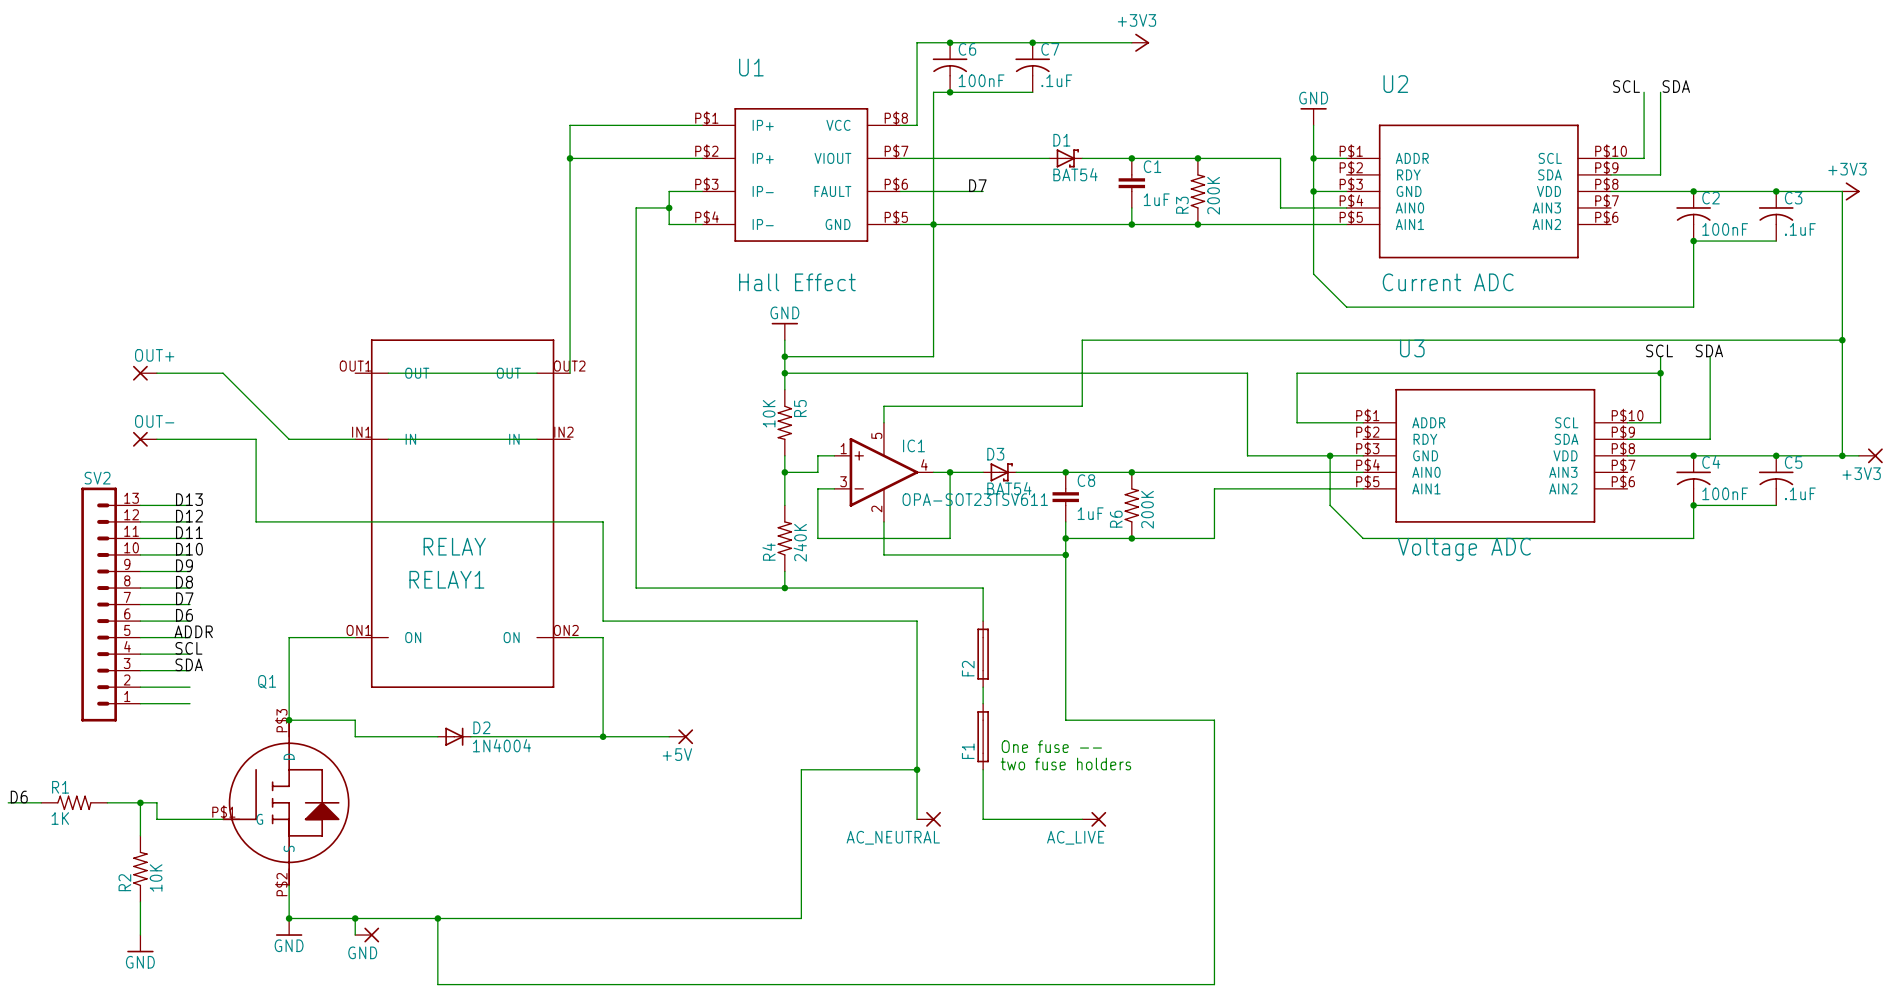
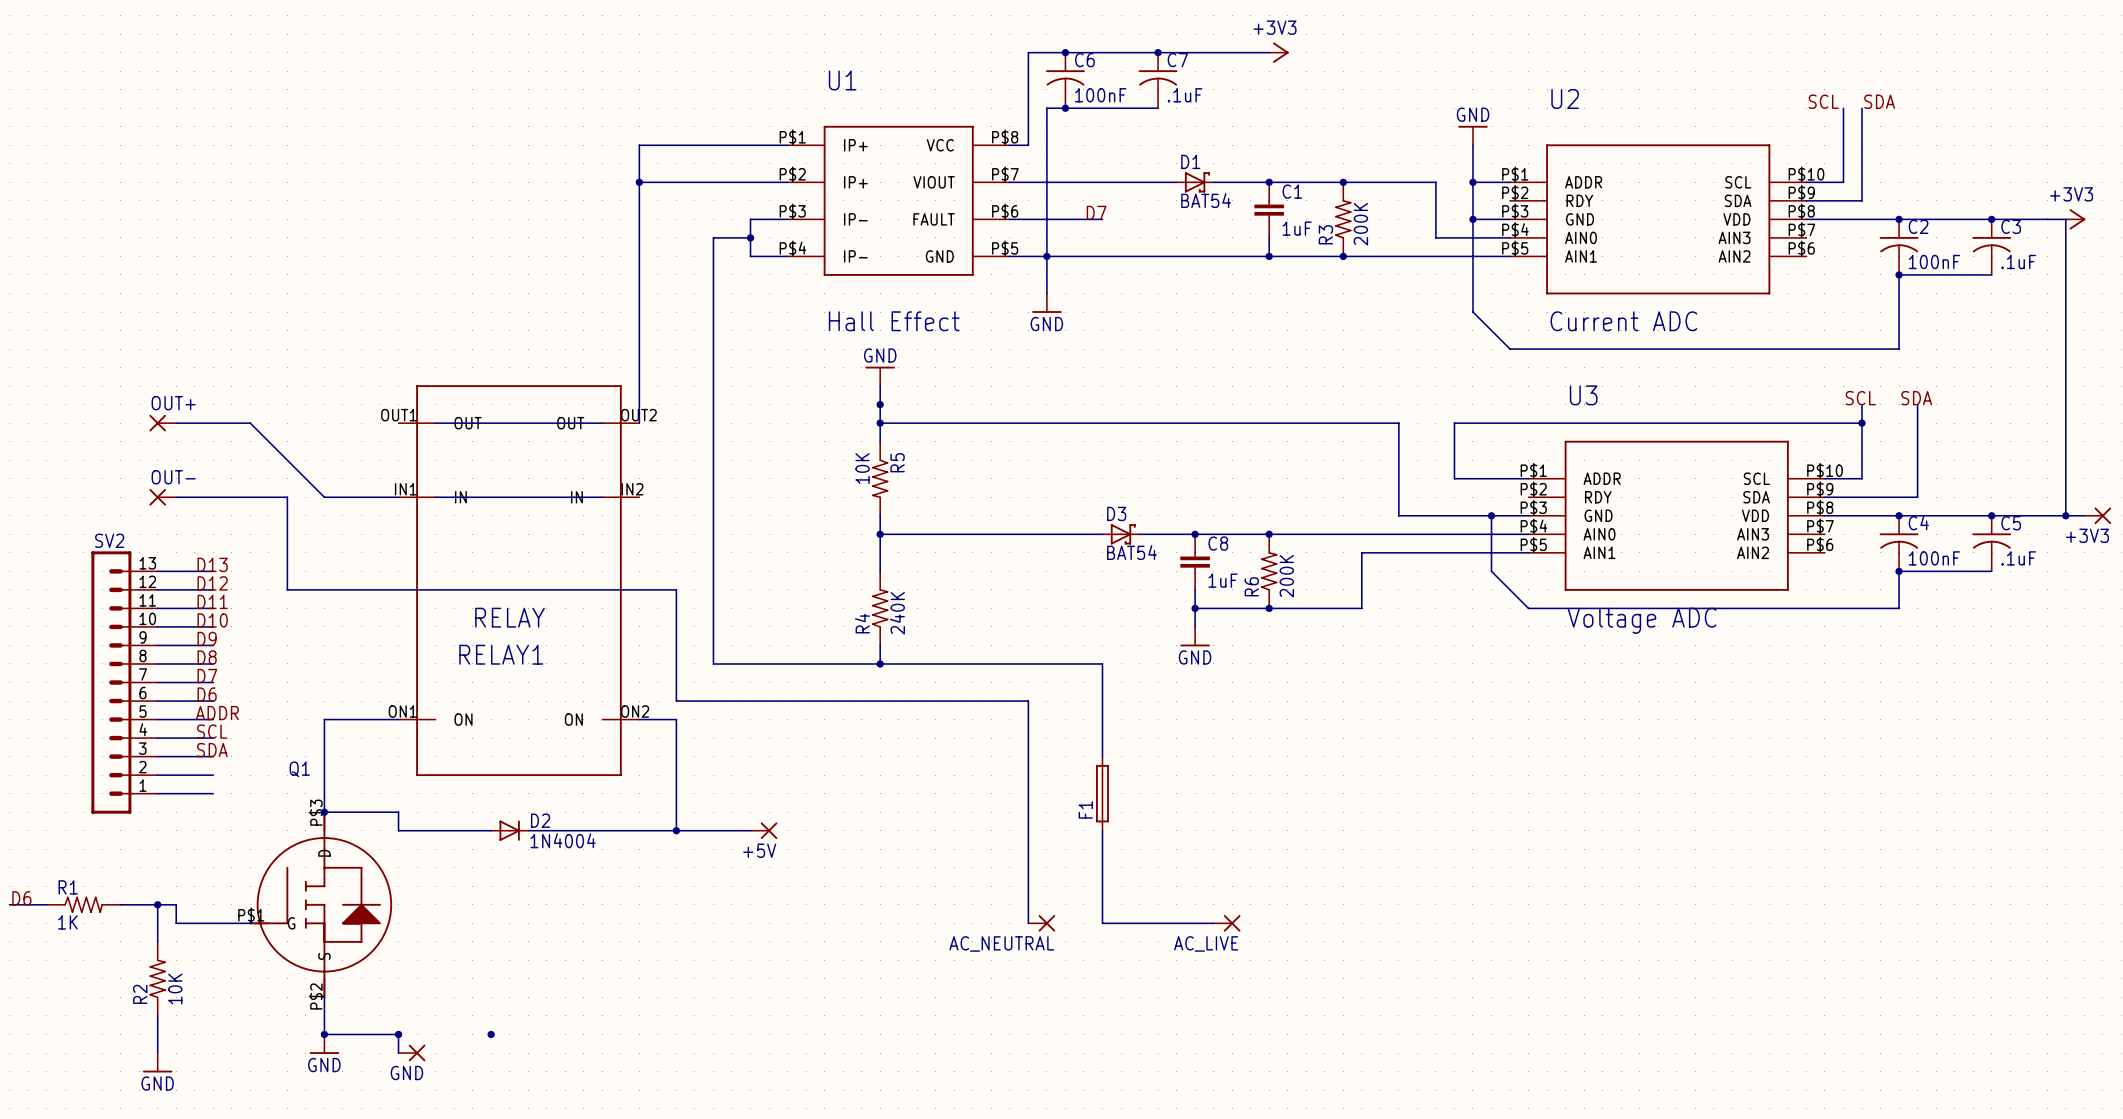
wire: (933, 257) (933, 356) (784, 356) -> none
power symbol: none -> GND (1046, 303)
wire: (1842, 340) (1082, 340) (1082, 406) (883, 406) (883, 422) -> none
junction: (1842, 340) -> none
wire: (834, 455) (817, 455) (817, 472) -> (1046, 534) (917, 534)
IC1: OPA-SOT23TSV611 (883, 472) -> none
wire: (950, 472) (950, 538) (817, 538) (817, 488) (834, 488) -> none
junction: (950, 472) -> none
wire: (883, 521) (883, 554) (1065, 554) (1065, 720) (1214, 720) (1214, 984) (437, 984) (437, 918) -> none
junction: (1065, 554) -> none
power symbol: none -> GND (1195, 636)
F2: (983, 654) -> none
F1 position: (983, 736) -> (1102, 793)
text: One fuse -- (1051, 746) -> none
text: two fuse holders (1065, 764) -> none
wire: (917, 769) (801, 769) (801, 918) (355, 918) -> none
junction: (917, 769) -> none

